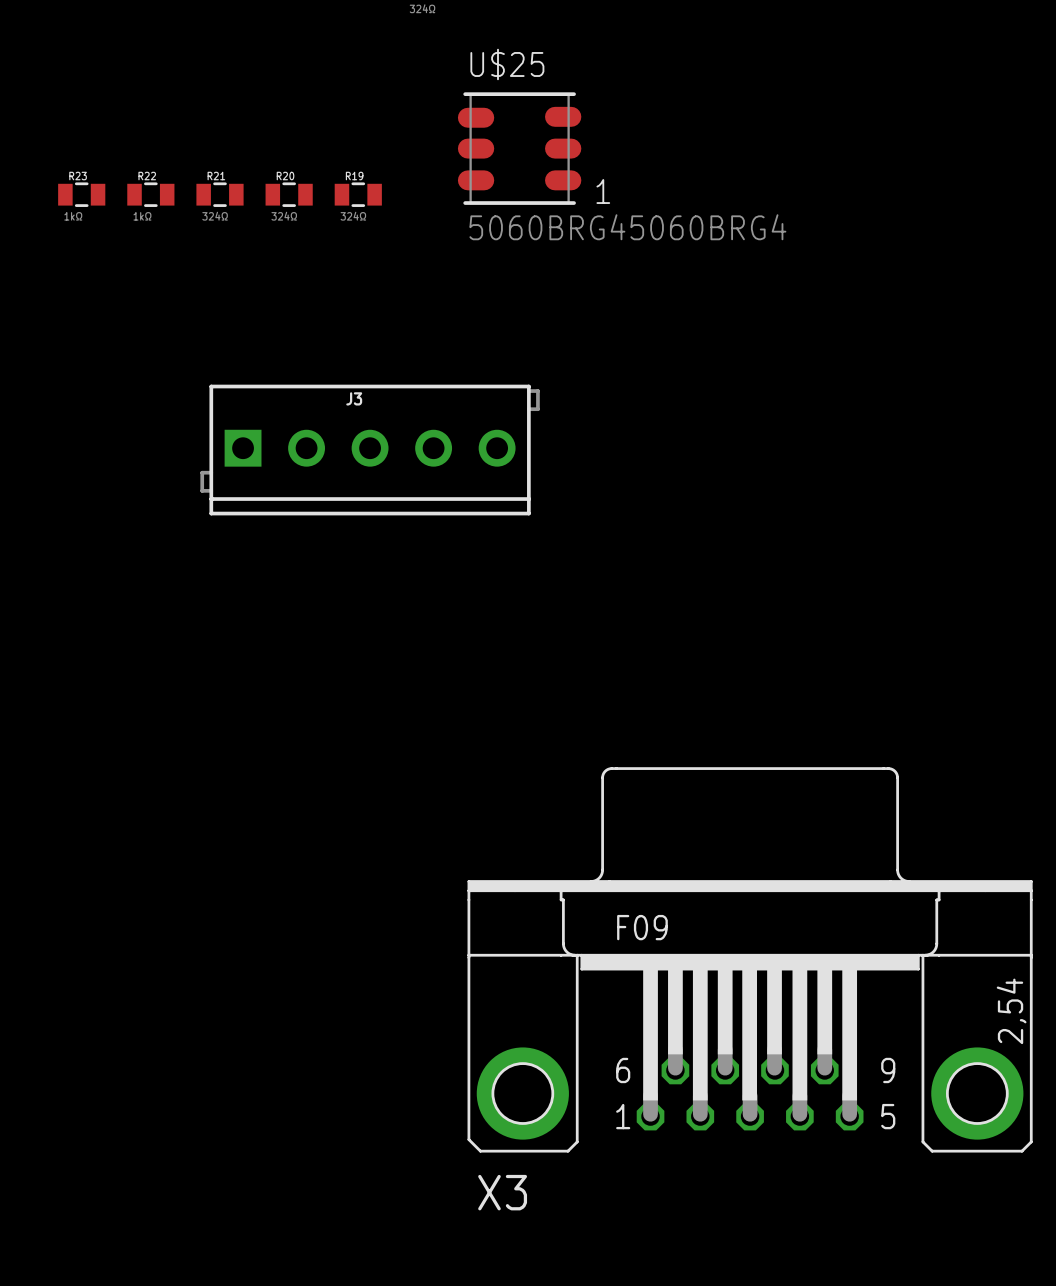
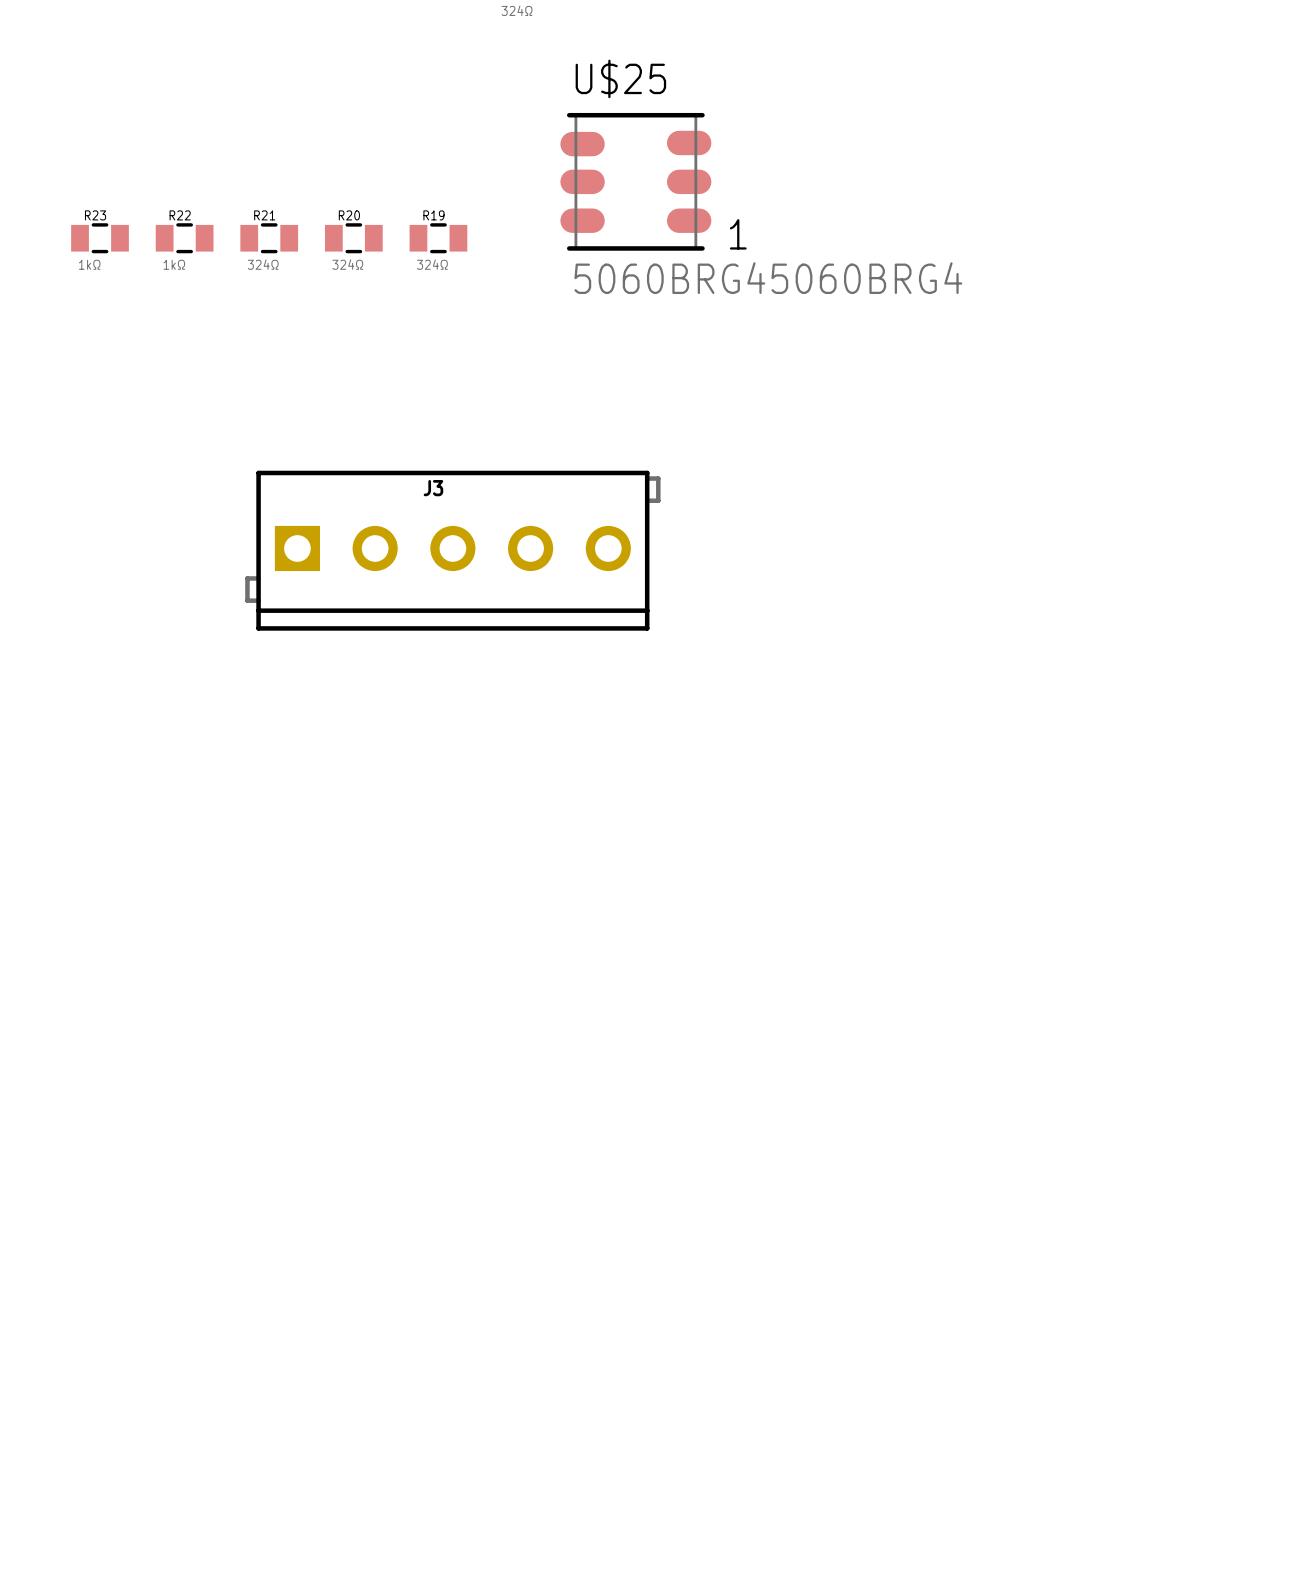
X3: (750, 959) -> none

